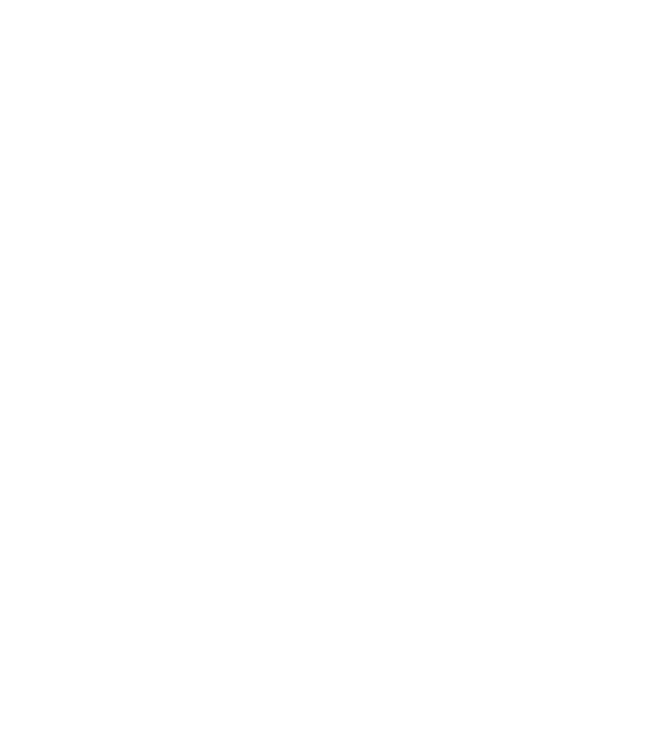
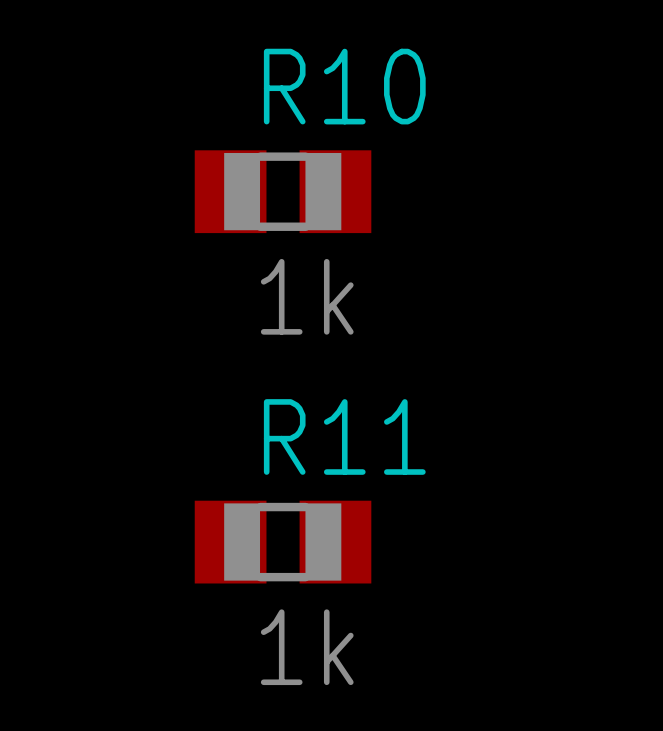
R10: none -> 1k (283, 191)
R11: none -> 1k (283, 542)

